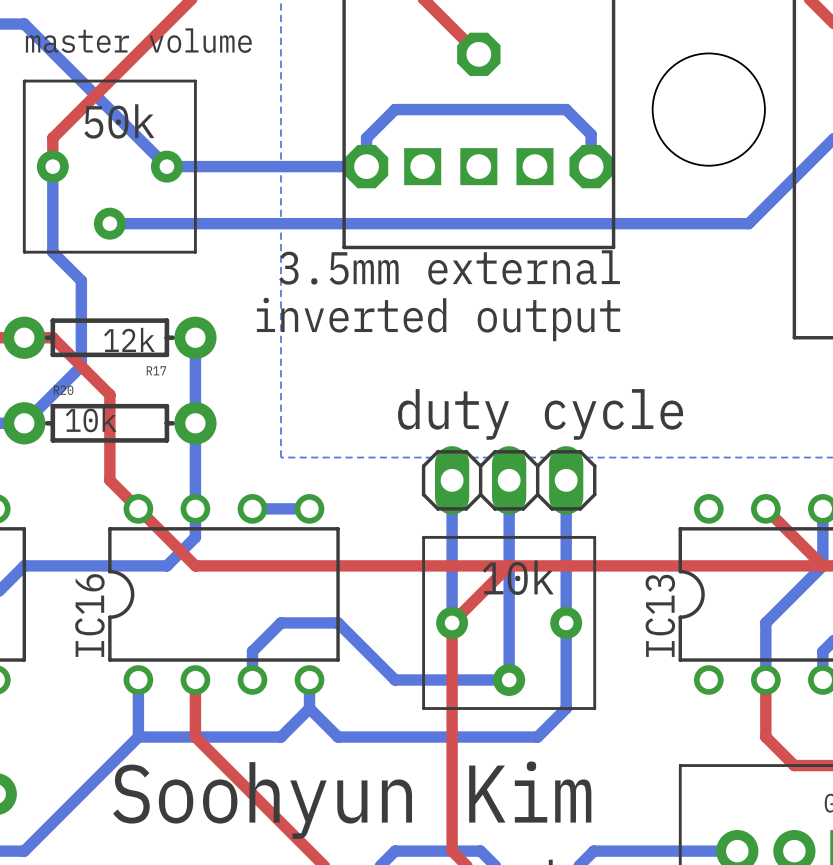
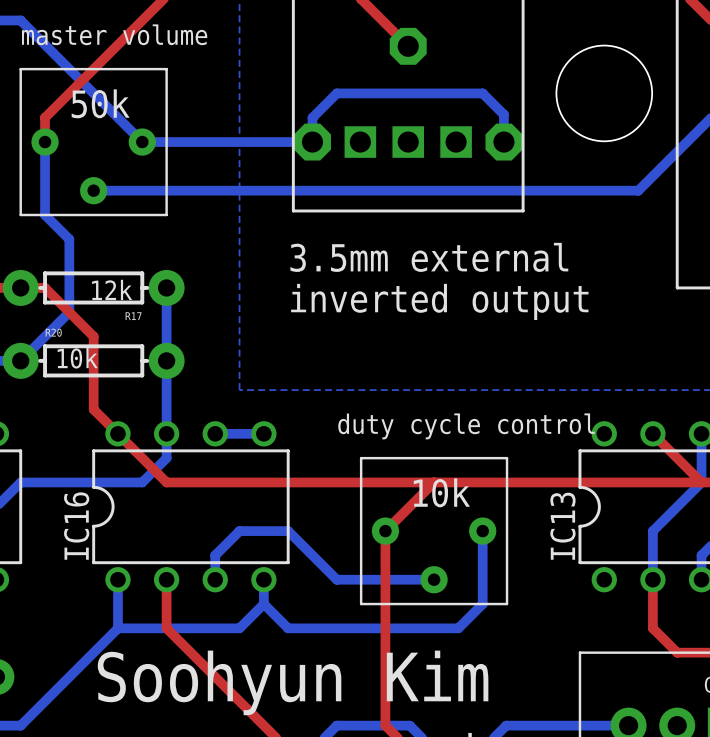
text position: 3.5mm external (449, 267) -> 3.5mm external (429, 257)
text position: inverted output (438, 319) -> inverted output (439, 301)
text: duty cycle (540, 414) -> none
bottom track: (452, 480) (452, 622) -> none
bottom track: (509, 480) (509, 679) -> none
part: (509, 480) -> none
bottom track: (566, 480) (566, 622) -> none
text: none -> duty cycle control (466, 426)

